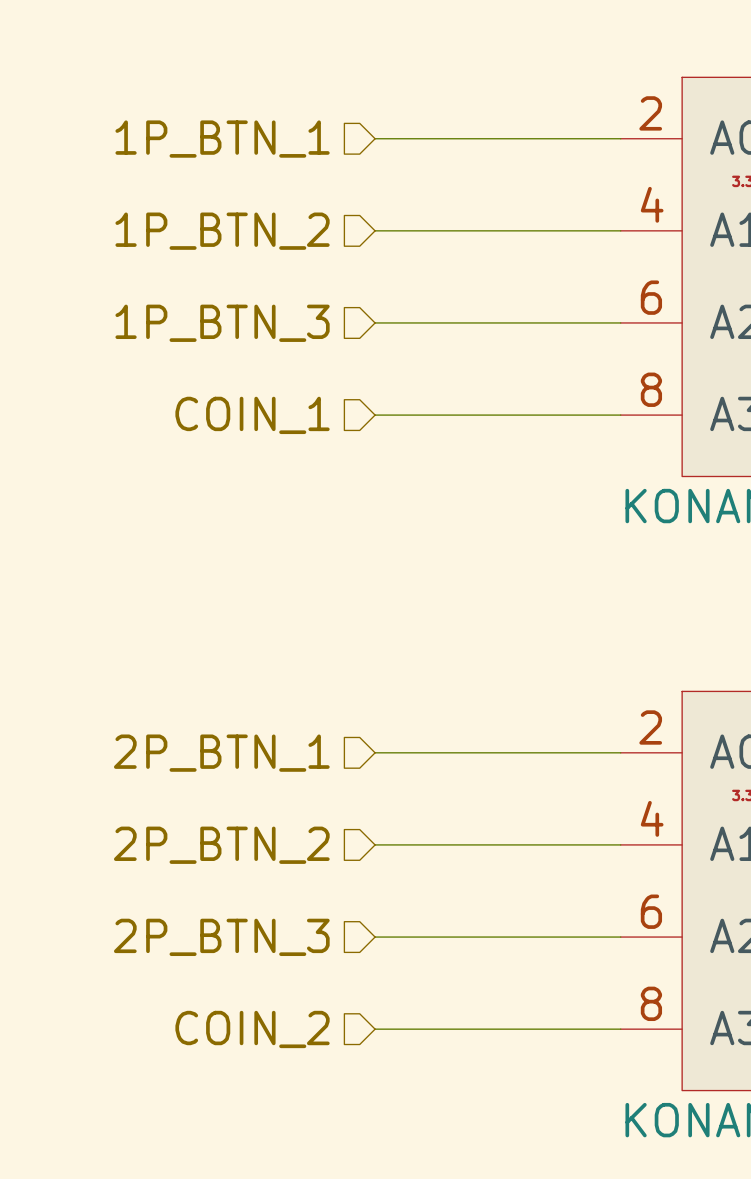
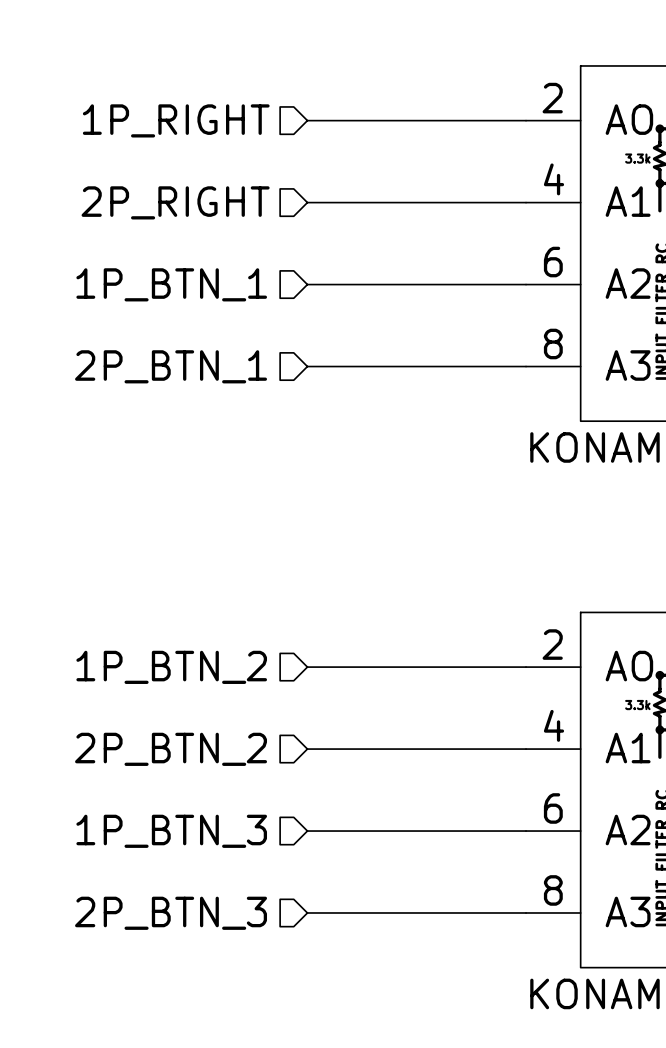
hierarchical label: 1P_BTN_1 (222, 139) -> 1P_RIGHT (176, 120)
hierarchical label: 1P_BTN_2 (222, 231) -> 2P_RIGHT (175, 202)
hierarchical label: 1P_BTN_3 (222, 323) -> 1P_BTN_1 (171, 284)
hierarchical label: COIN_1 (252, 415) -> 2P_BTN_1 (171, 366)
hierarchical label: 2P_BTN_1 (221, 753) -> 1P_BTN_2 (171, 667)
hierarchical label: 2P_BTN_3 (221, 937) -> 1P_BTN_3 (171, 831)
hierarchical label: COIN_2 (252, 1029) -> 2P_BTN_3 (171, 913)

